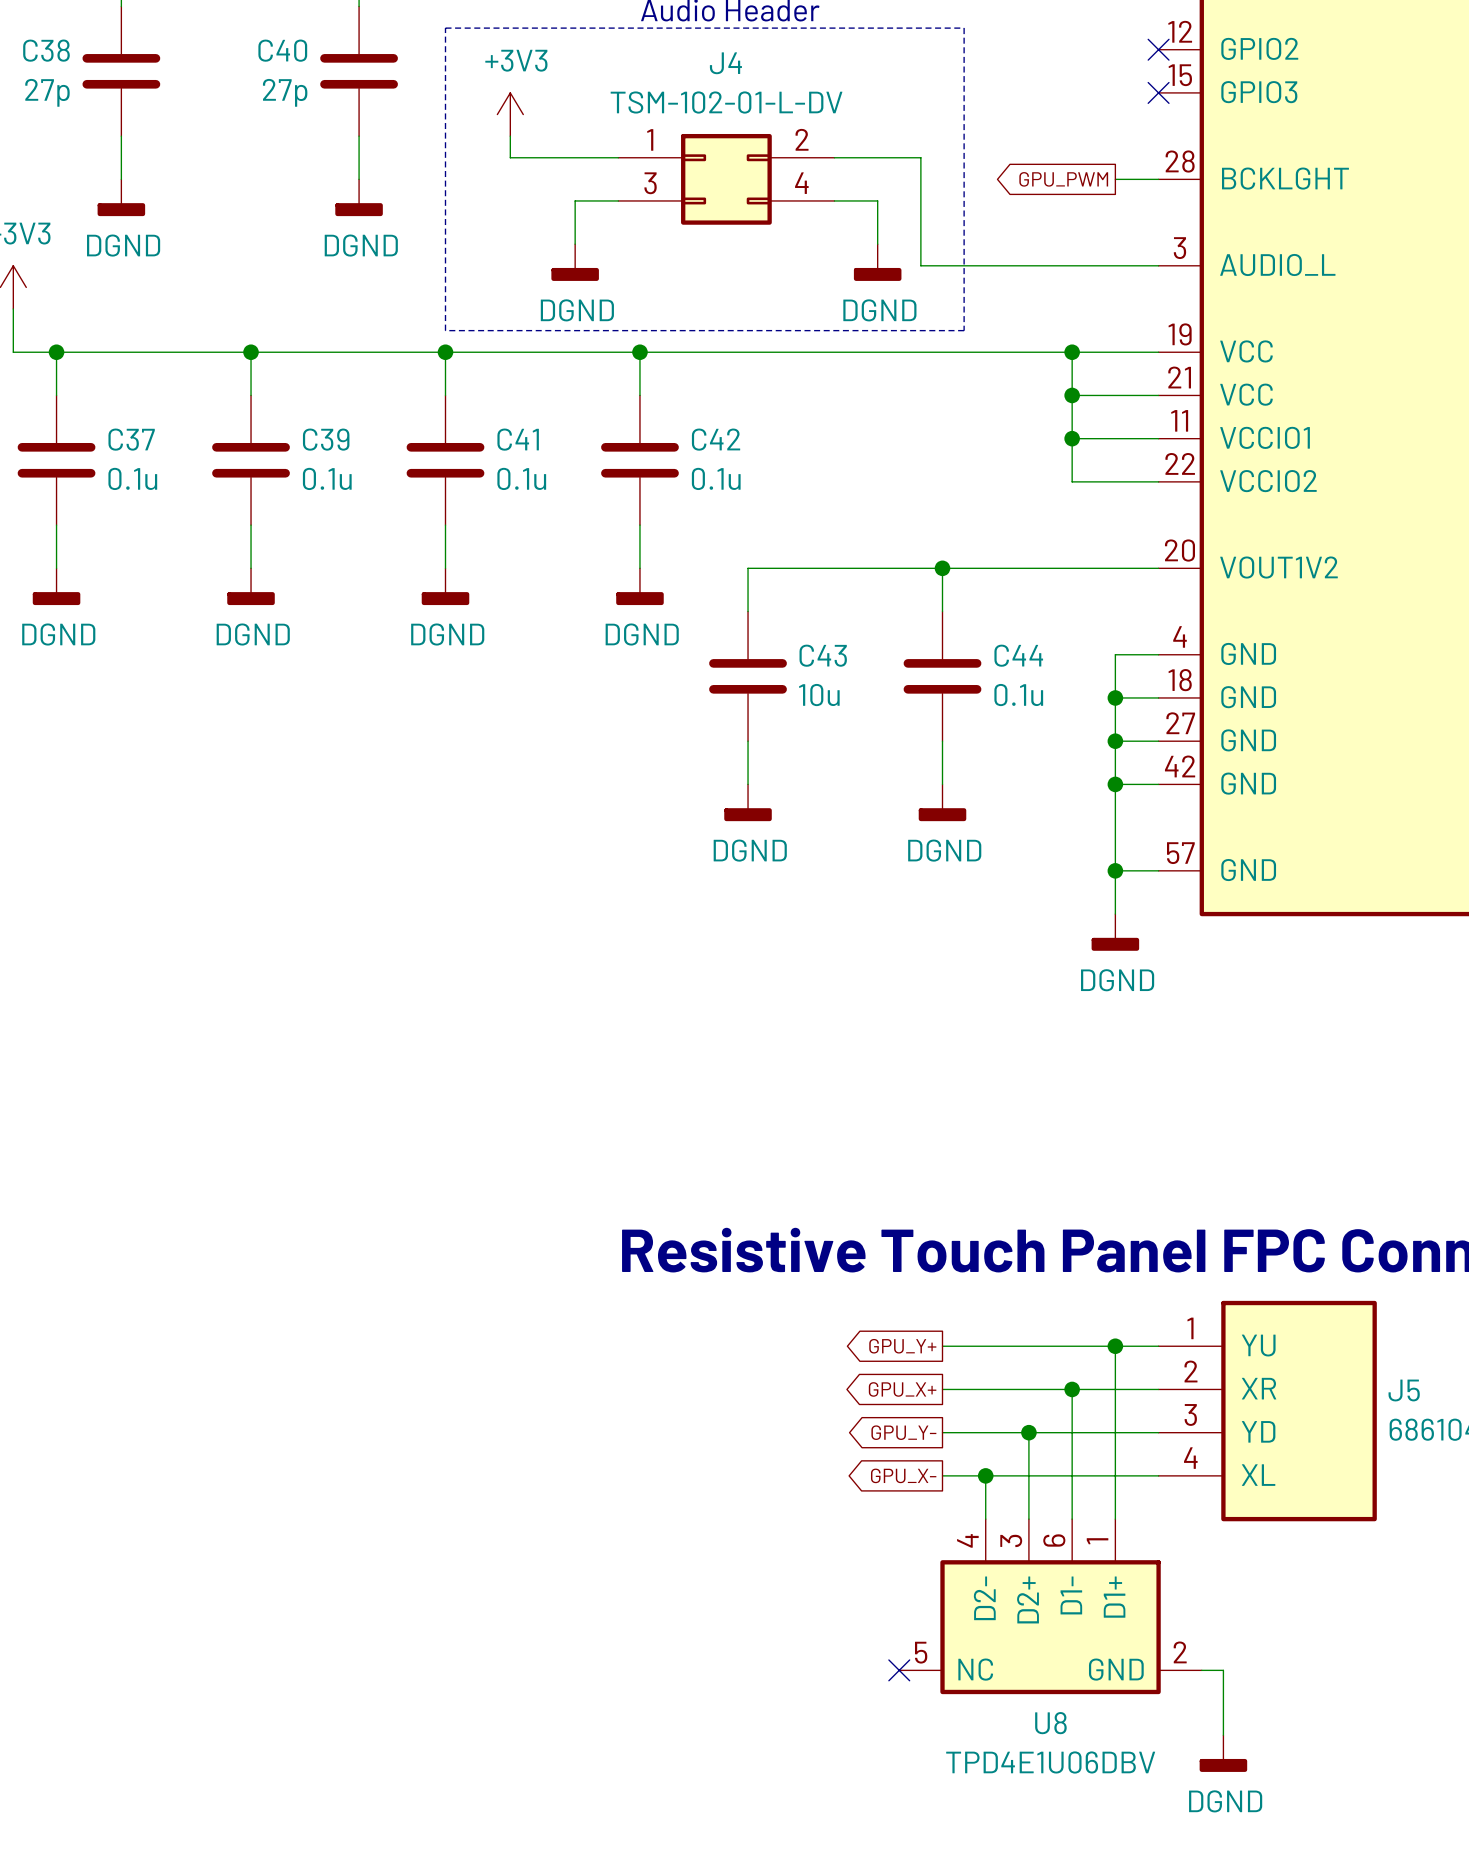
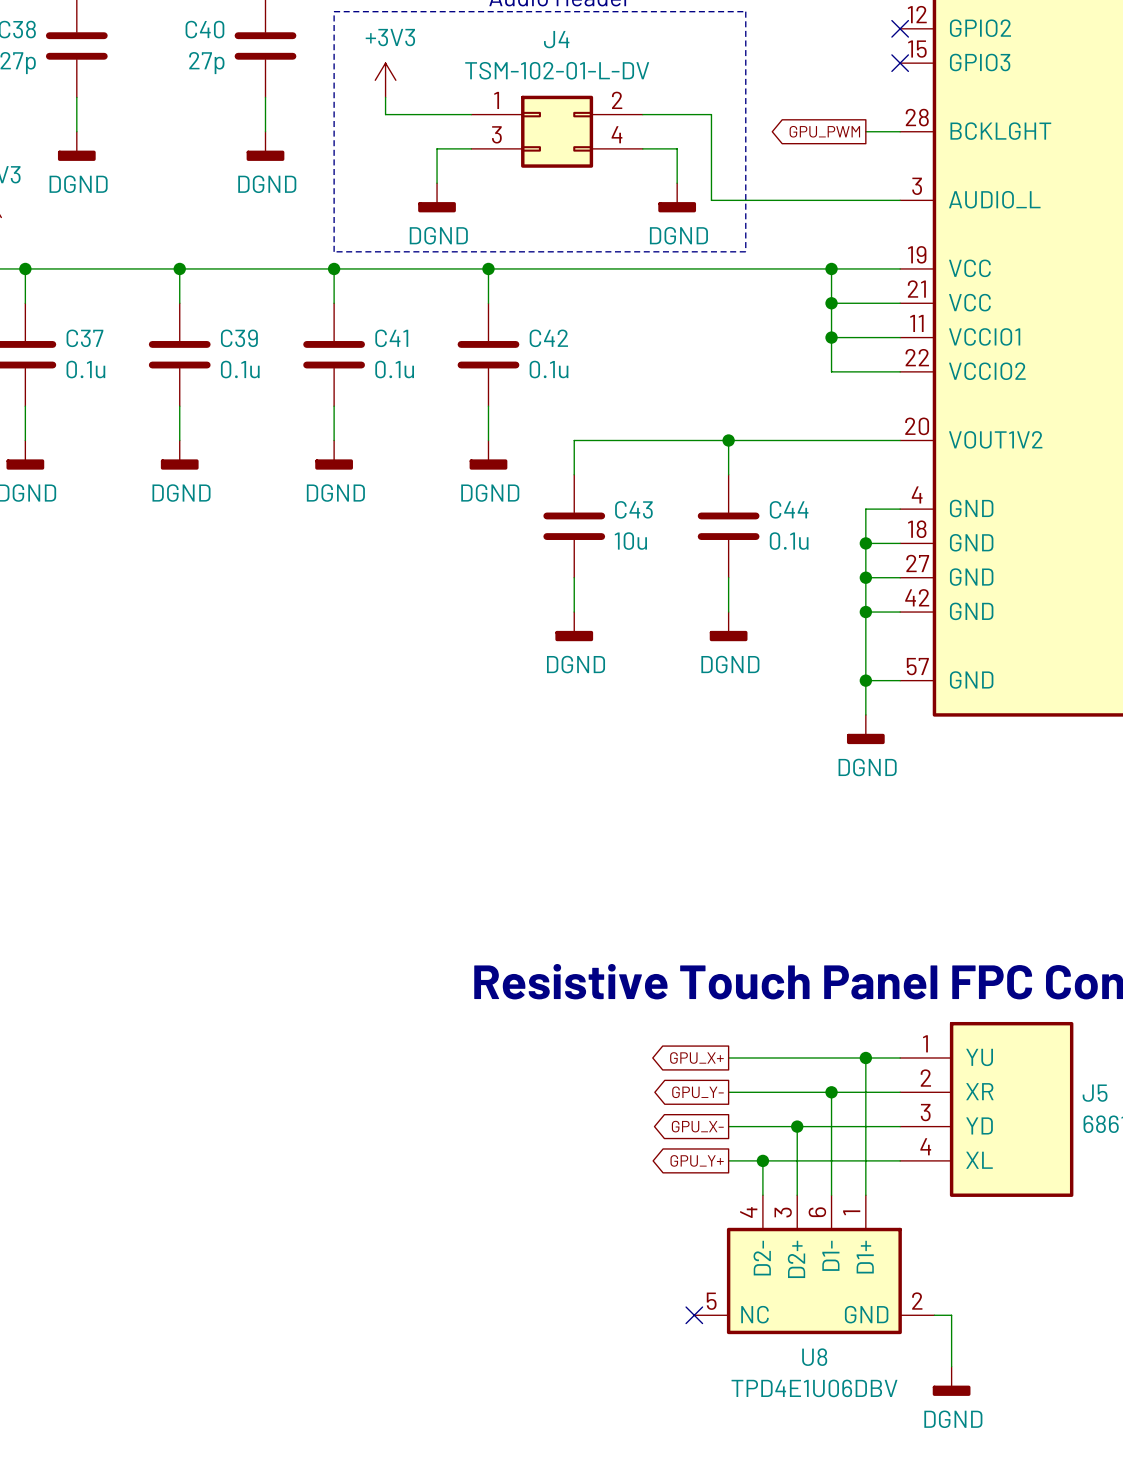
global label: GPU_Y+ (902, 1346) -> GPU_X+ (696, 1057)
global label: GPU_X+ (902, 1389) -> GPU_Y- (697, 1092)
global label: GPU_Y- (903, 1432) -> GPU_X- (697, 1126)
global label: GPU_X- (903, 1475) -> GPU_Y+ (697, 1160)

